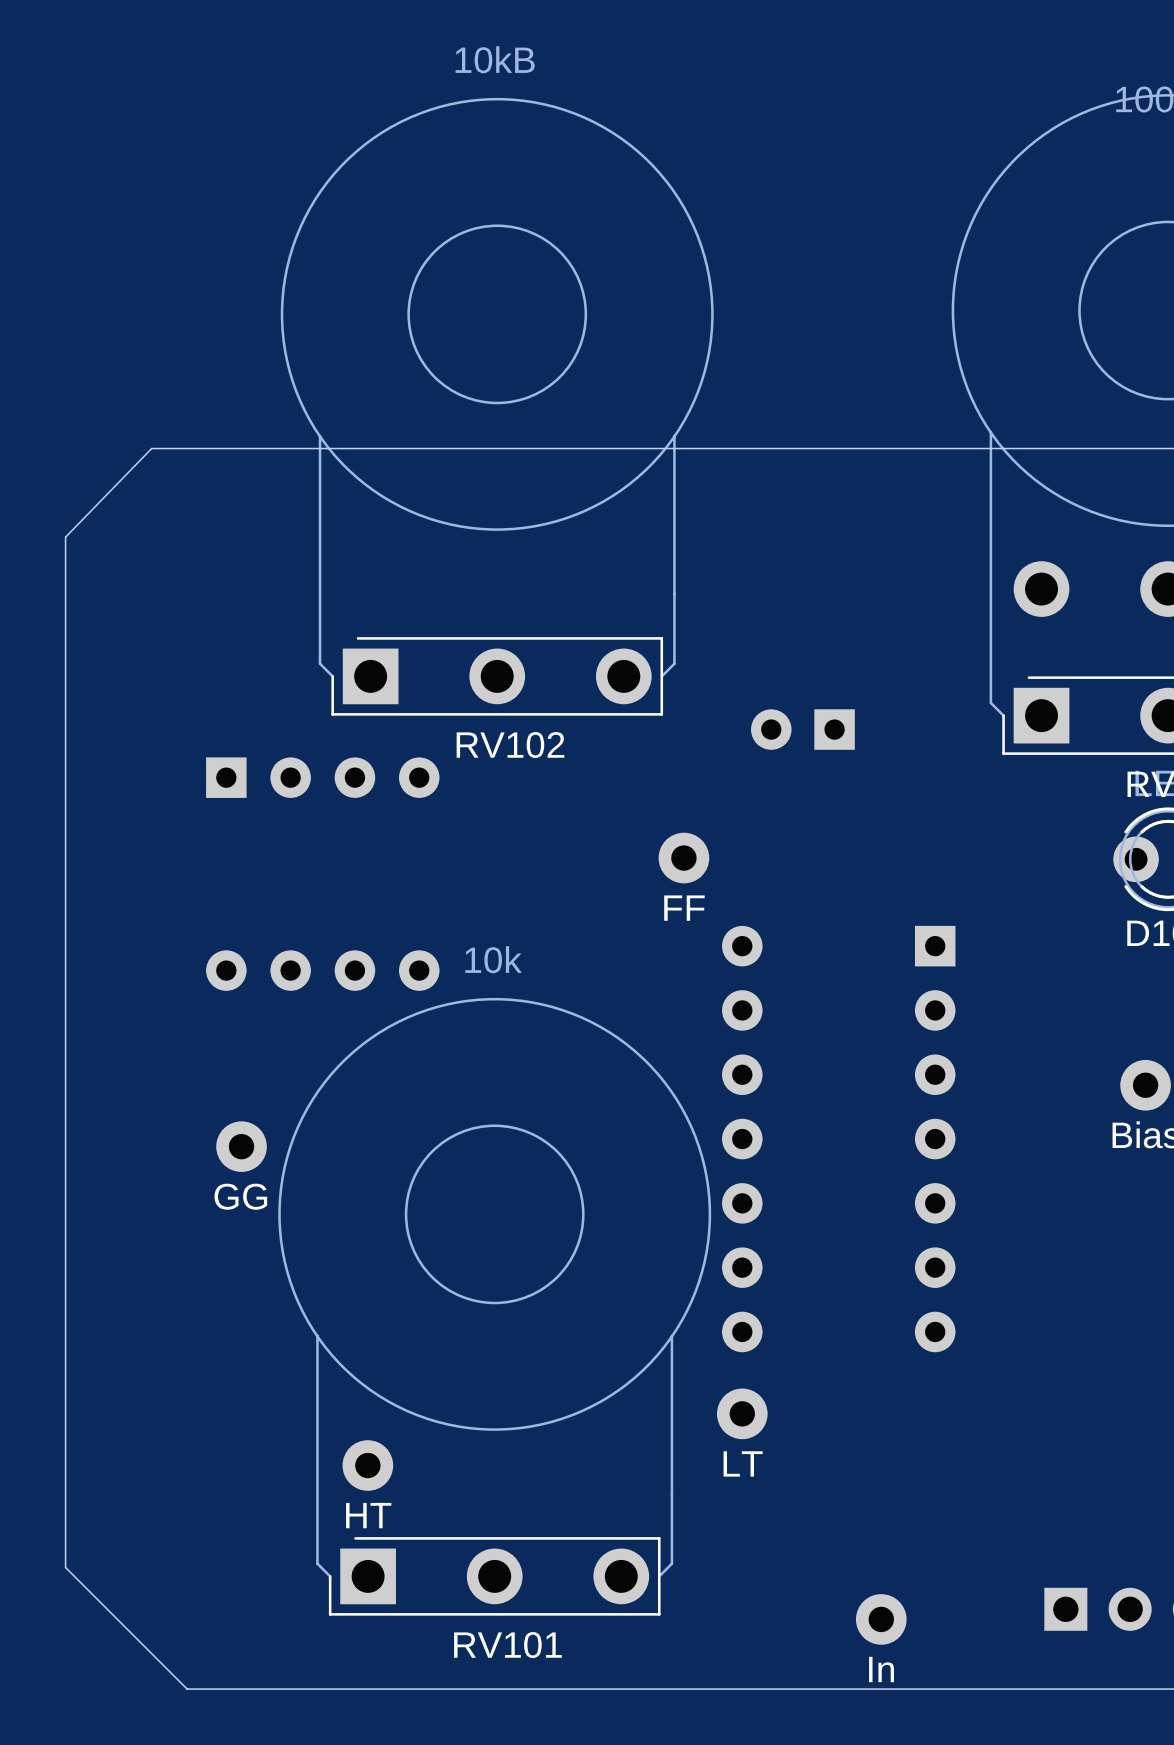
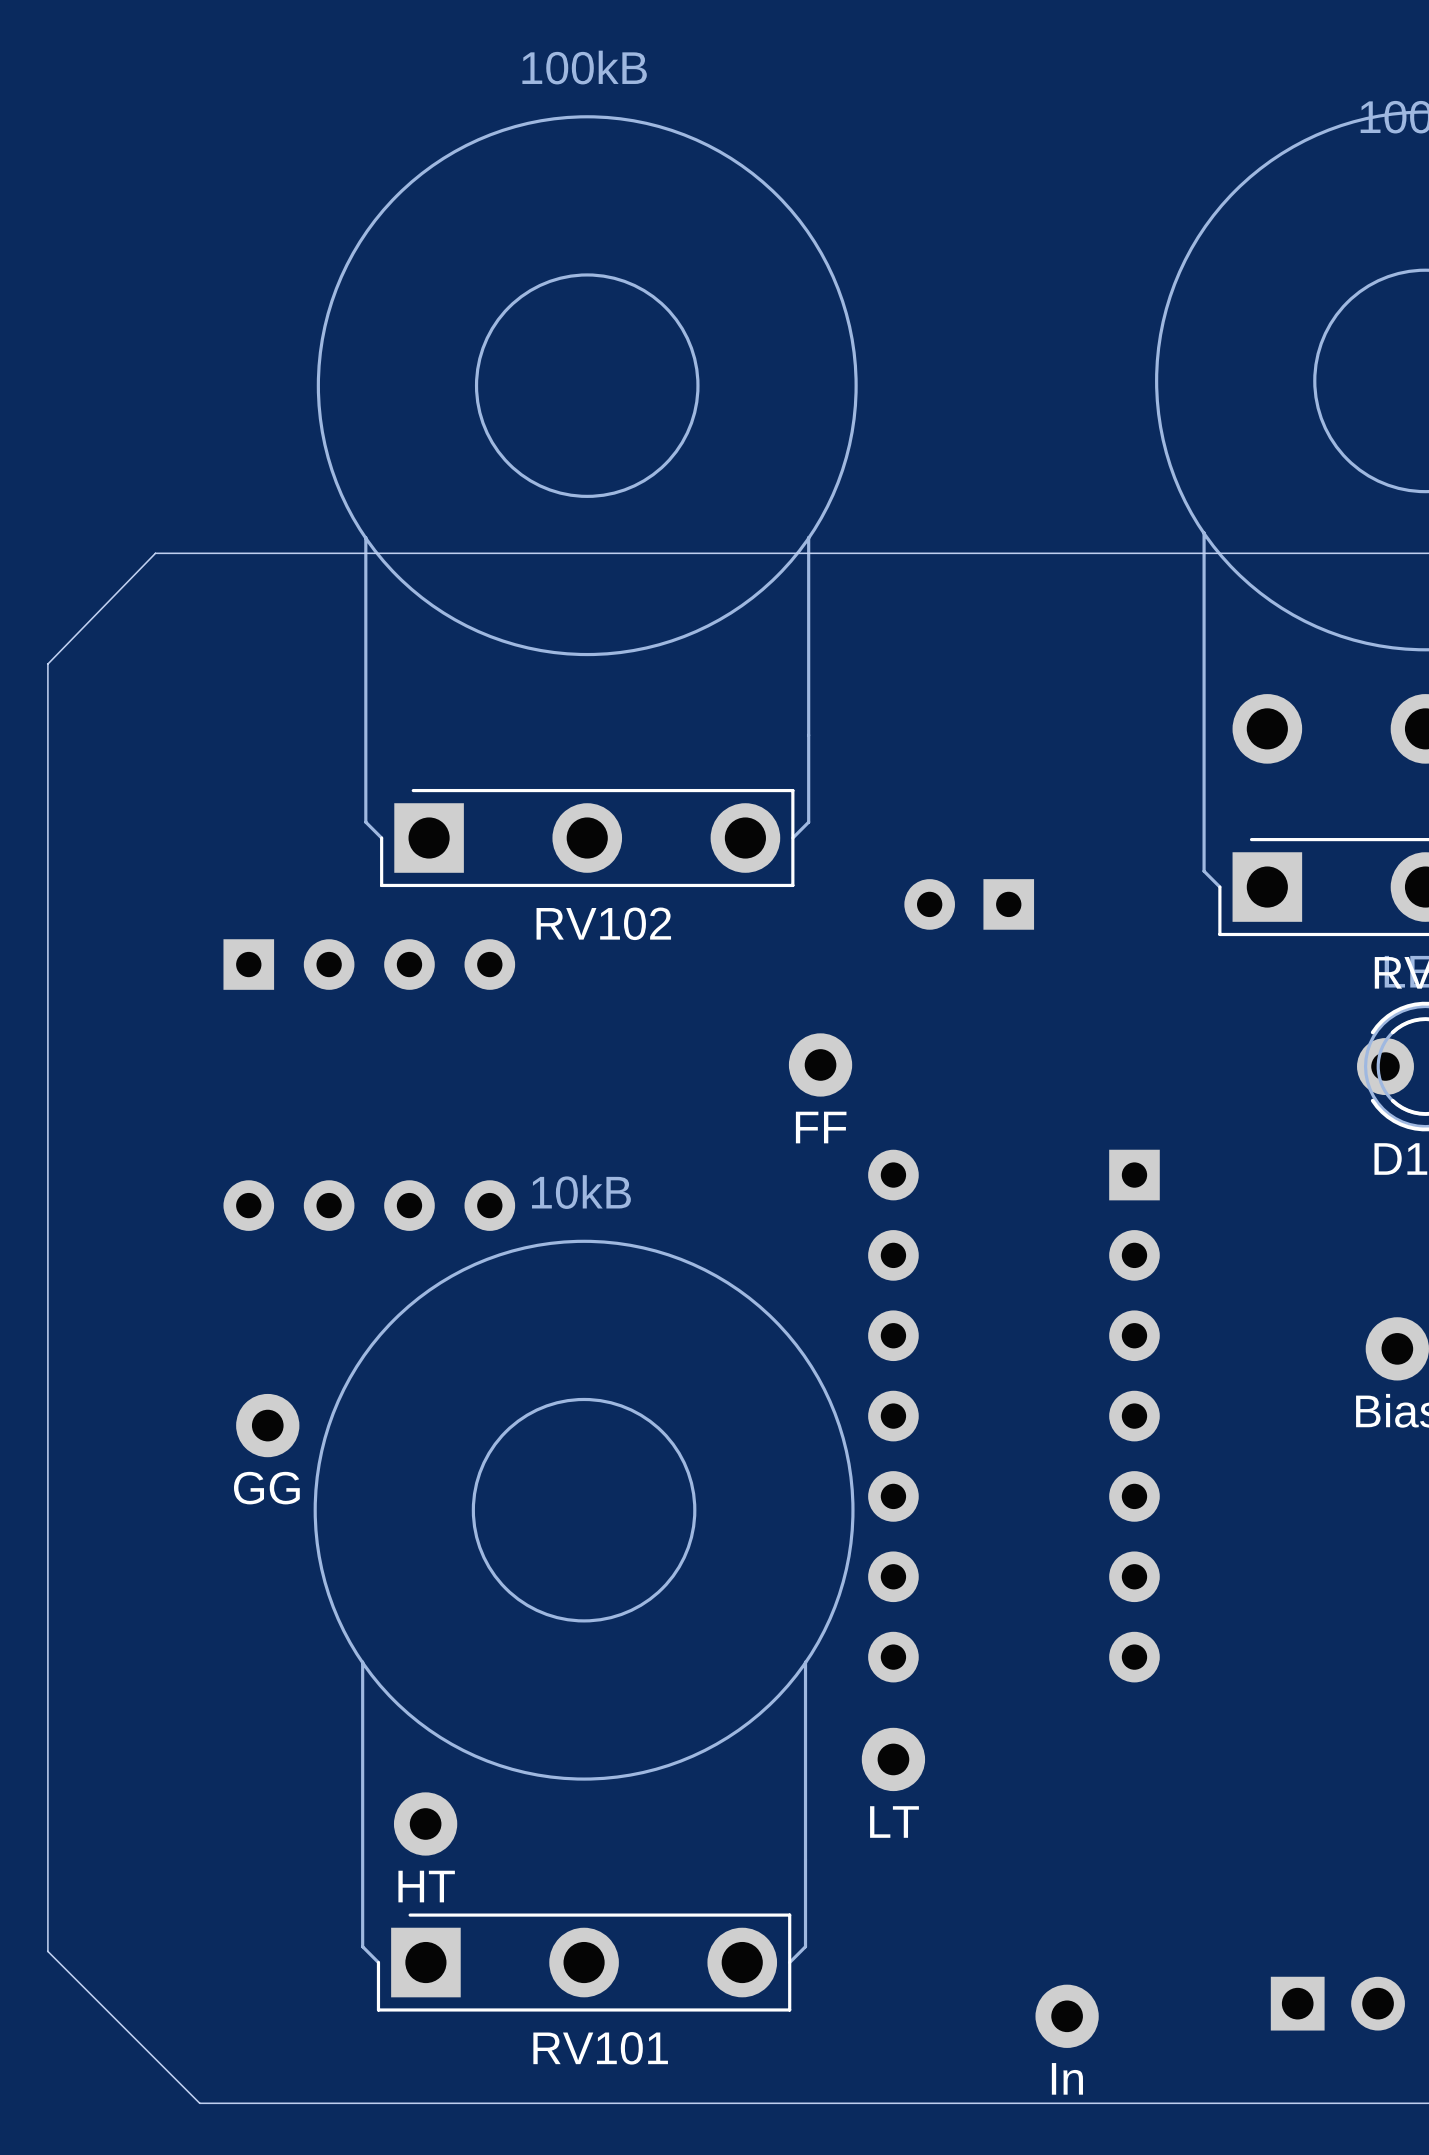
RV102 value: 10kB (495, 59) -> 100kB (584, 67)
RV101 value: 10k (493, 959) -> 10kB (581, 1192)

